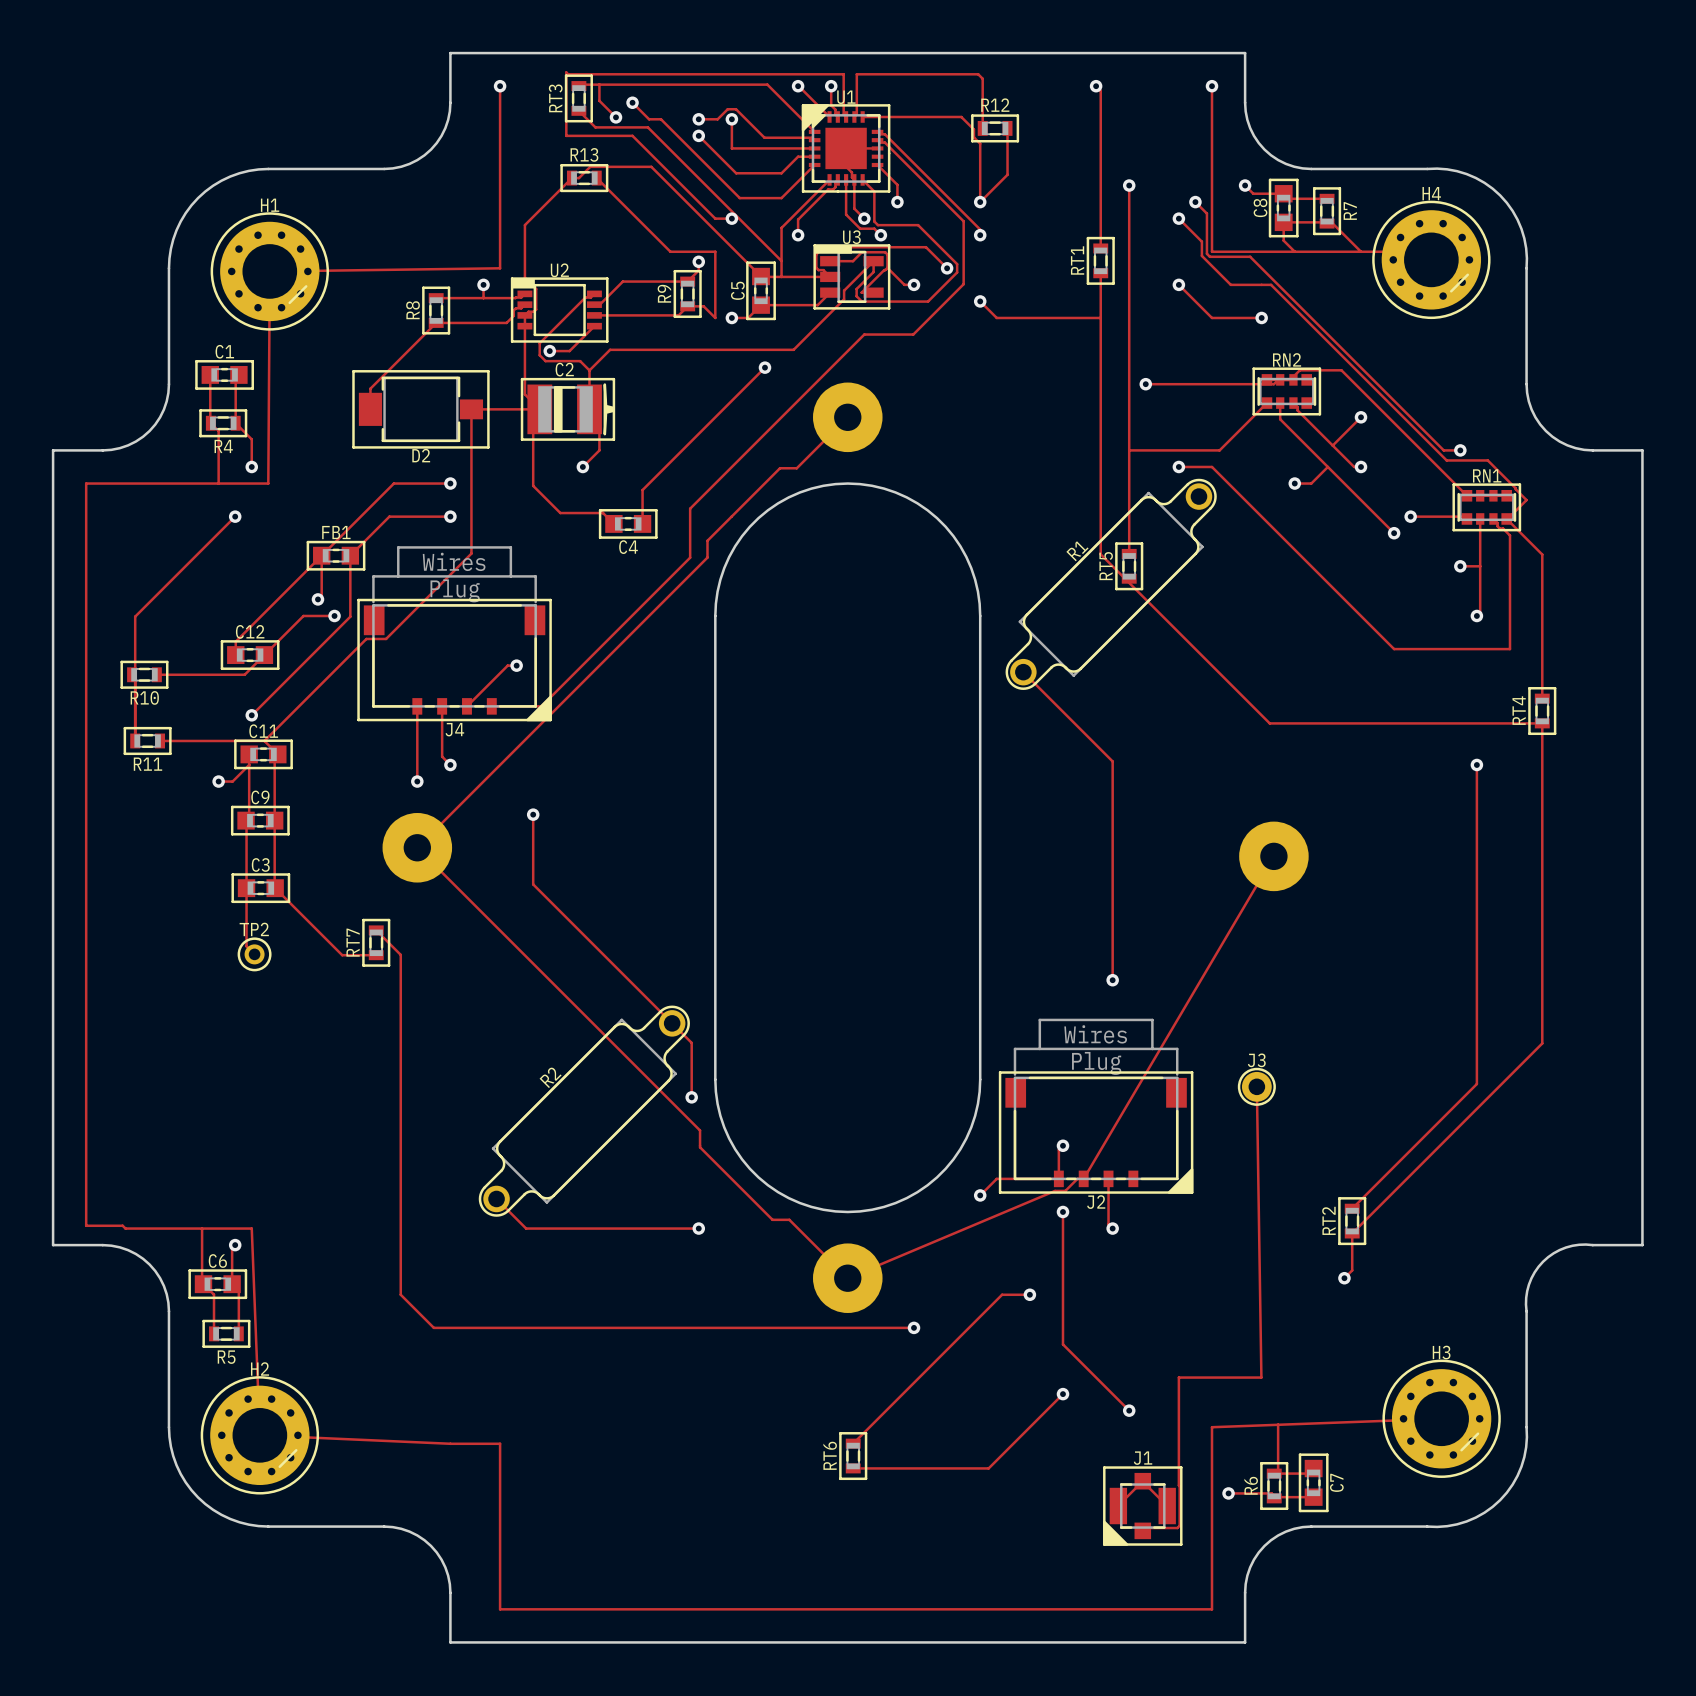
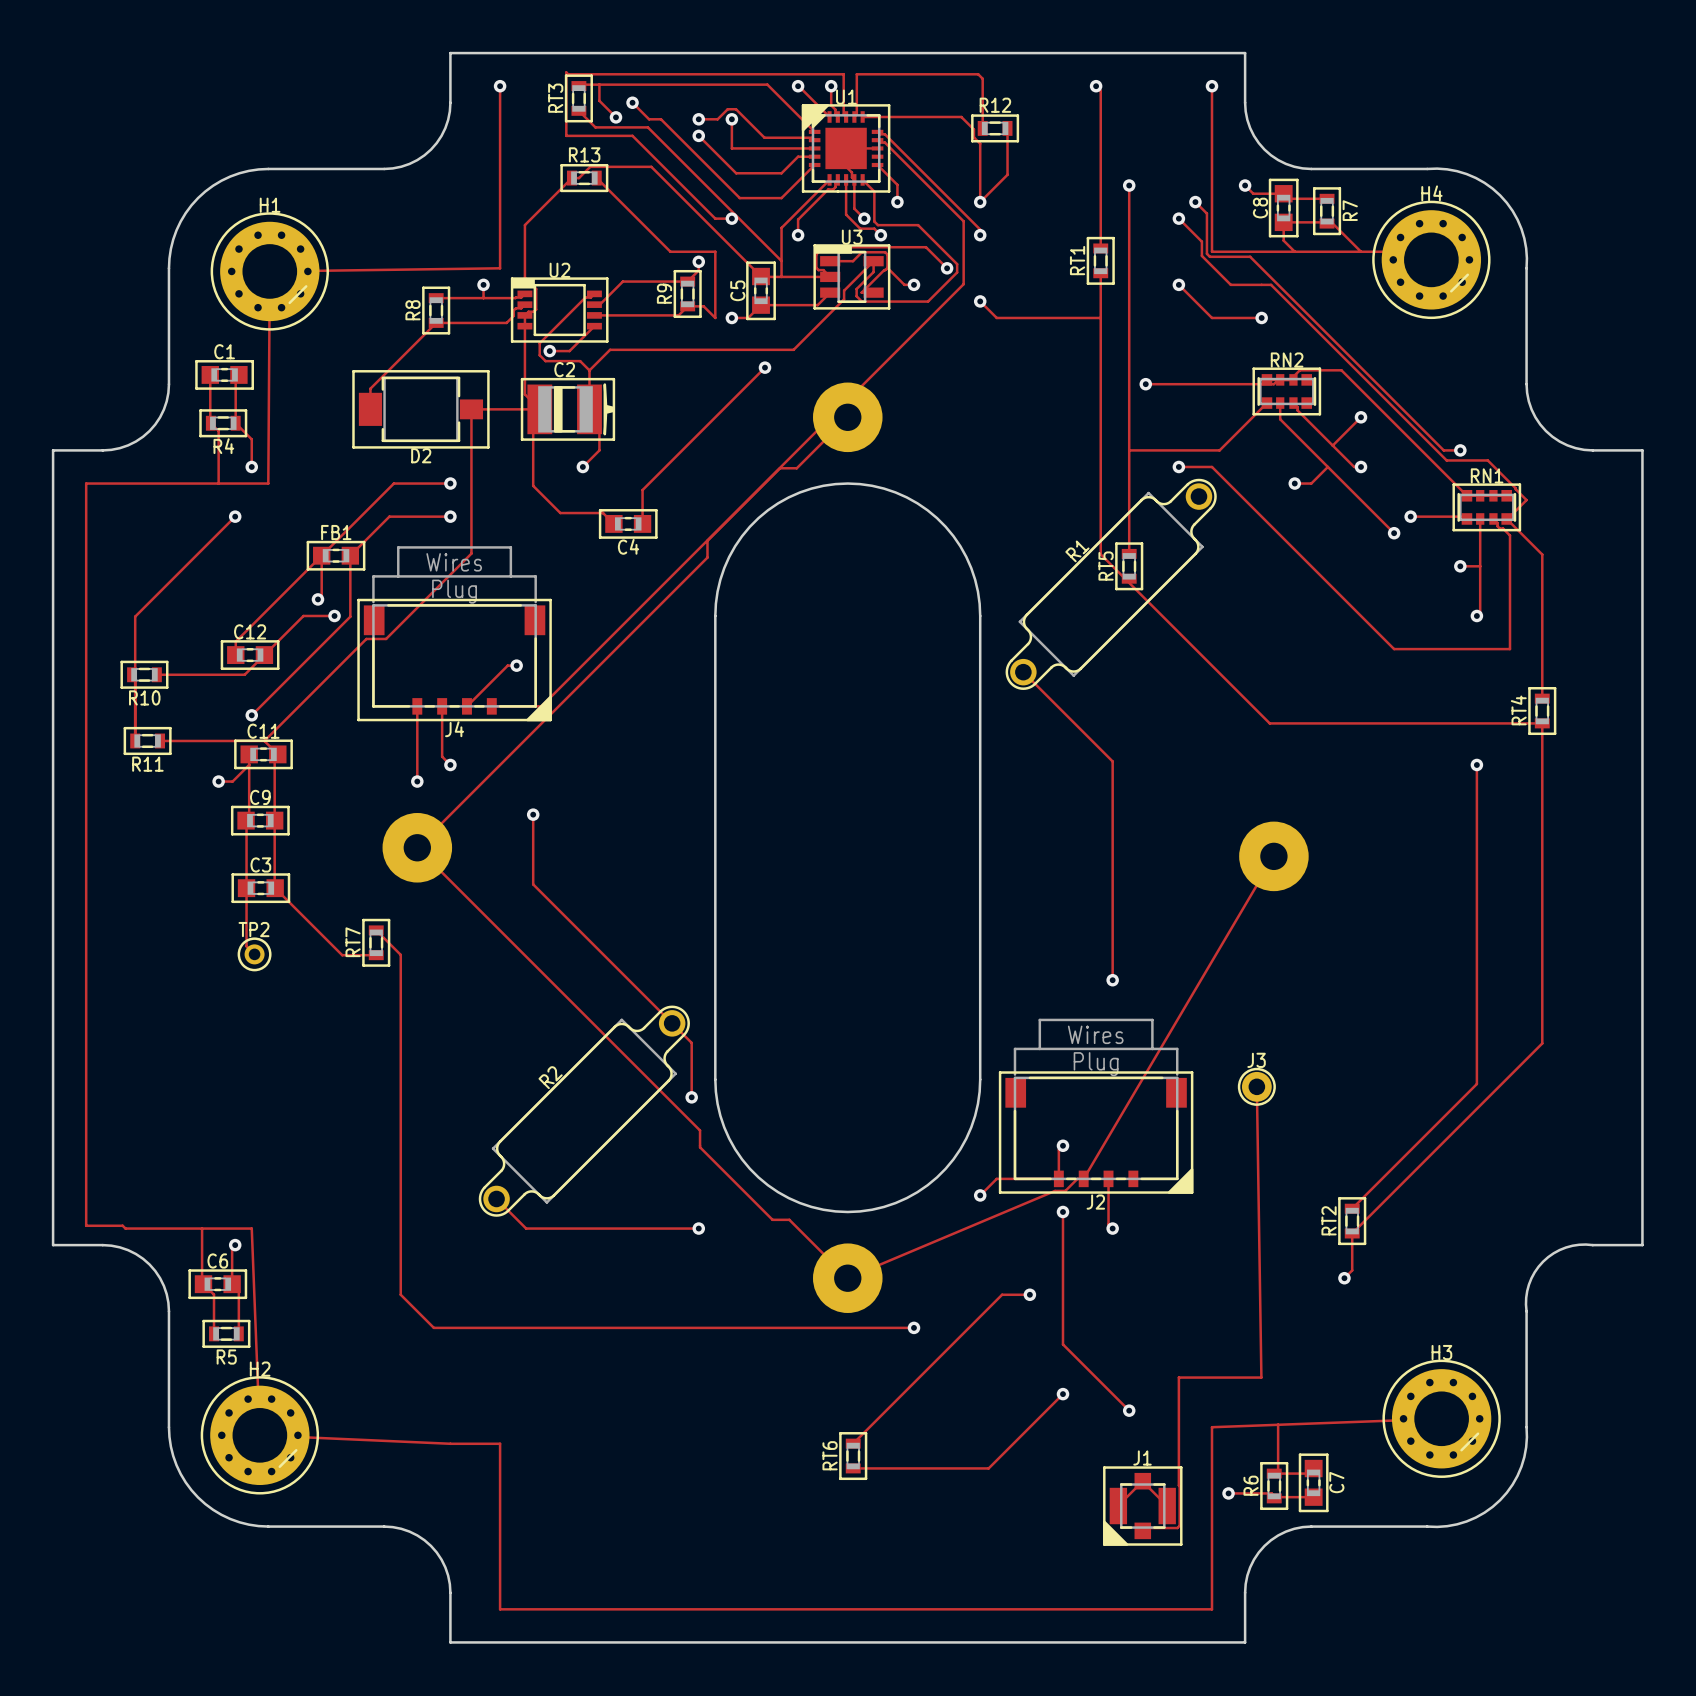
track: (913, 334) (864, 334) (690, 508) (690, 557) -> (913, 334) (690, 557)

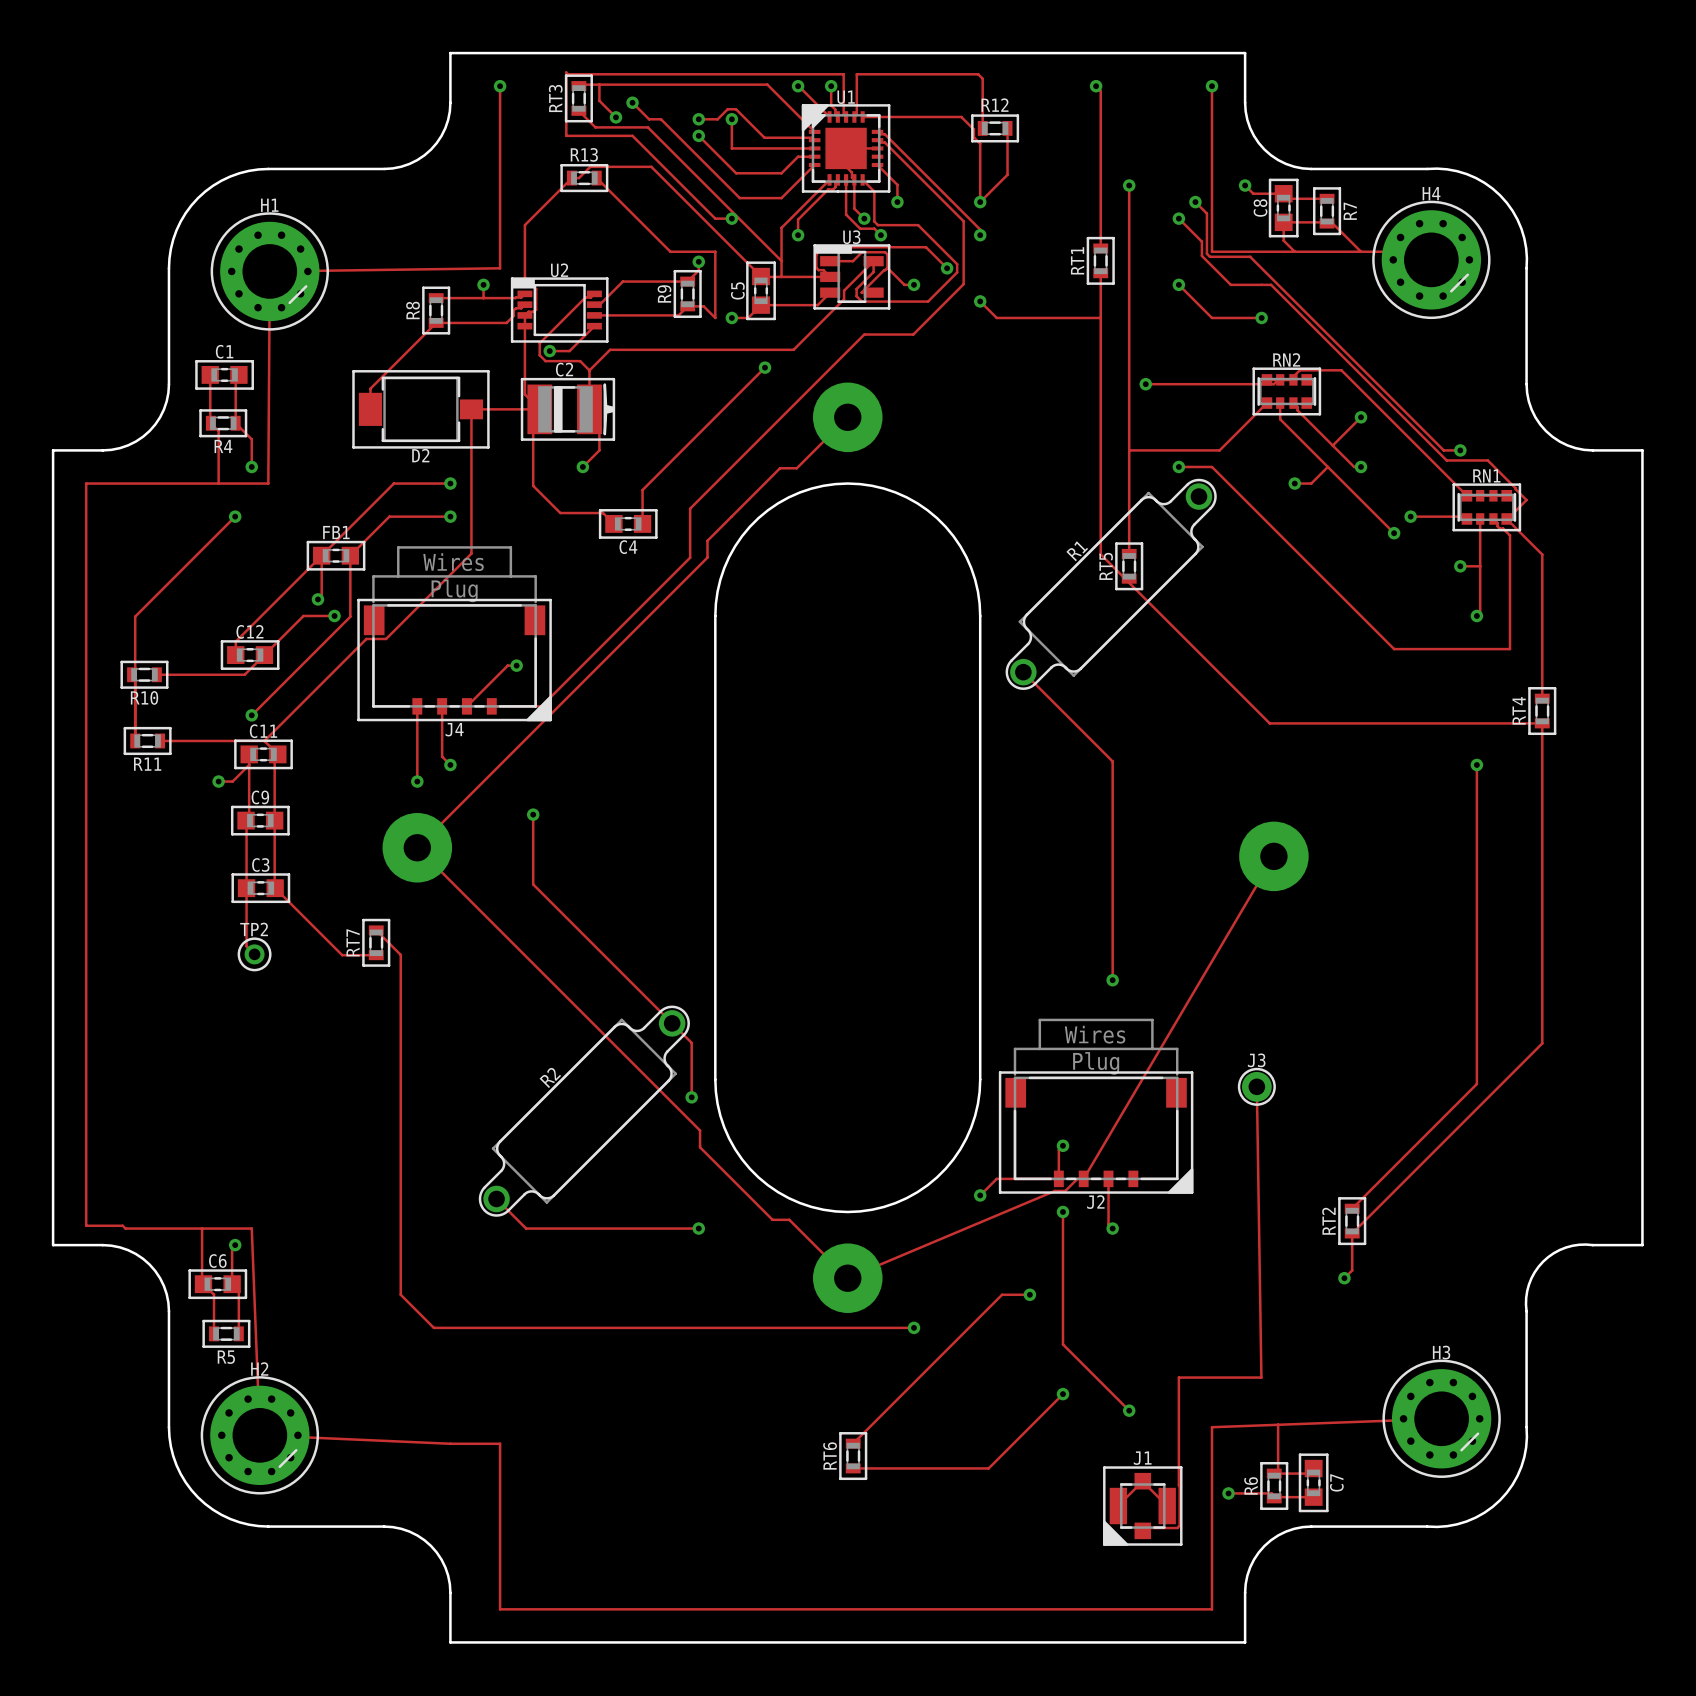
track: (913, 334) (690, 557) -> (913, 334) (864, 334) (690, 508) (690, 557)

